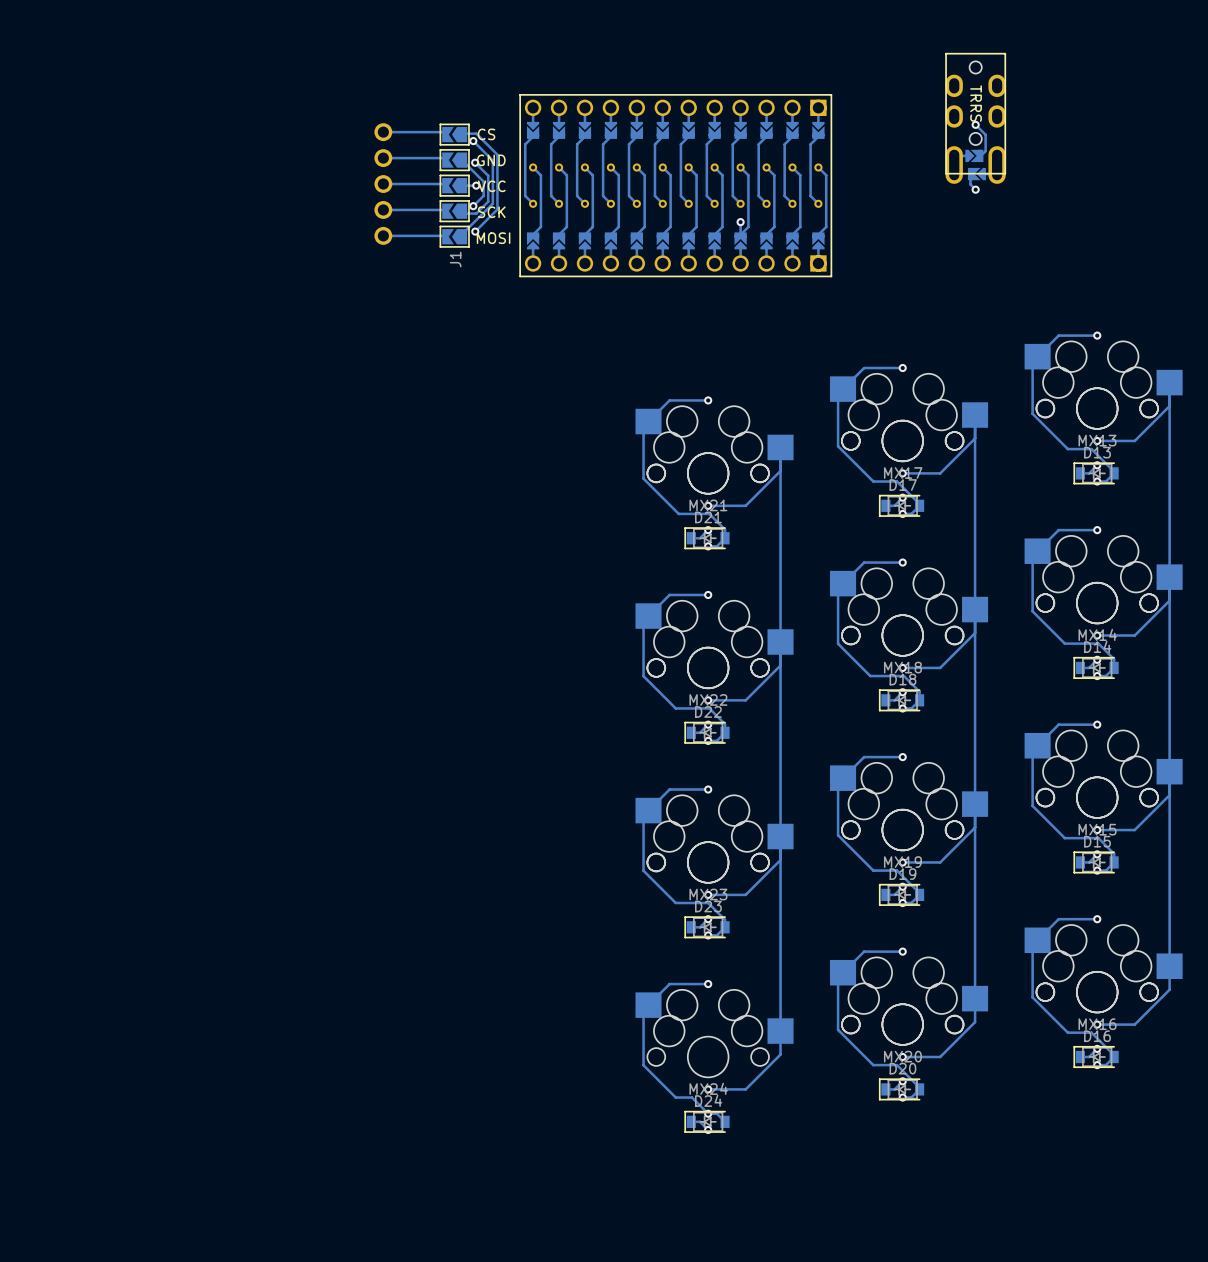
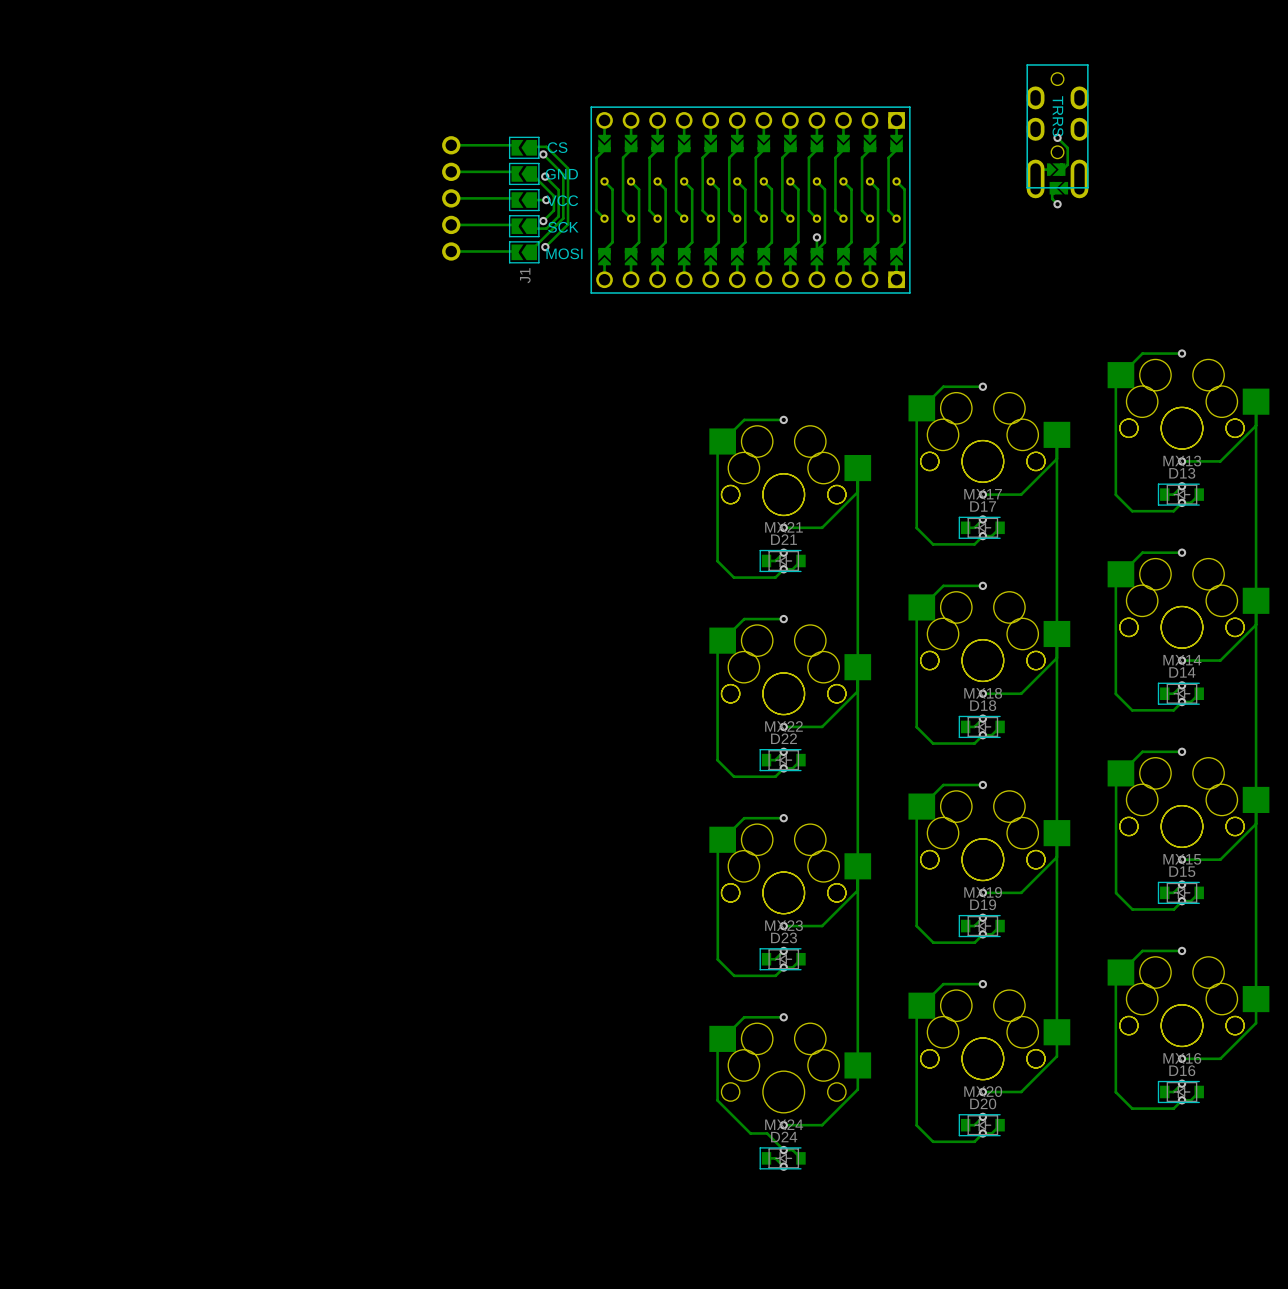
track: (1032, 413) (1067, 449) (1091, 449) (1114, 471) -> (1115, 433) (1115, 494) (1132, 511) (1173, 511) (1182, 502)
track: (838, 446) (873, 481) (896, 481) (919, 504) -> (916, 466) (916, 528) (933, 544) (974, 544) (982, 536)
track: (643, 478) (678, 513) (709, 513) (725, 529) (725, 538) -> (717, 500) (717, 561) (733, 577) (775, 577) (783, 569)
track: (1032, 611) (1064, 643) (1098, 643) (1114, 659) (1114, 667) -> (1115, 635) (1115, 693) (1132, 710) (1173, 710) (1182, 702)
track: (838, 643) (870, 676) (903, 676) (919, 691) (919, 700) -> (916, 669) (916, 727) (933, 743) (974, 743) (982, 735)
track: (643, 676) (675, 708) (709, 708) (725, 724) (725, 732) -> (717, 702) (717, 760) (733, 776) (775, 776) (783, 768)
track: (1032, 750) (1032, 805) (1064, 838) (1098, 838) (1114, 853) (1114, 862) -> (1116, 778) (1116, 893) (1132, 909) (1173, 909) (1182, 901)
track: (643, 815) (643, 870) (675, 902) (708, 902) (725, 919) (725, 927) -> (717, 844) (717, 959) (734, 975) (775, 975) (783, 967)
track: (838, 835) (873, 870) (896, 870) (919, 894) -> (916, 865) (916, 926) (933, 942) (974, 942) (983, 934)
track: (1032, 997) (1067, 1032) (1091, 1032) (1114, 1057) -> (1115, 1031) (1115, 1092) (1132, 1108) (1173, 1108) (1182, 1100)
track: (838, 1029) (873, 1065) (896, 1065) (919, 1089) -> (916, 1064) (916, 1125) (933, 1141) (974, 1141) (982, 1133)

